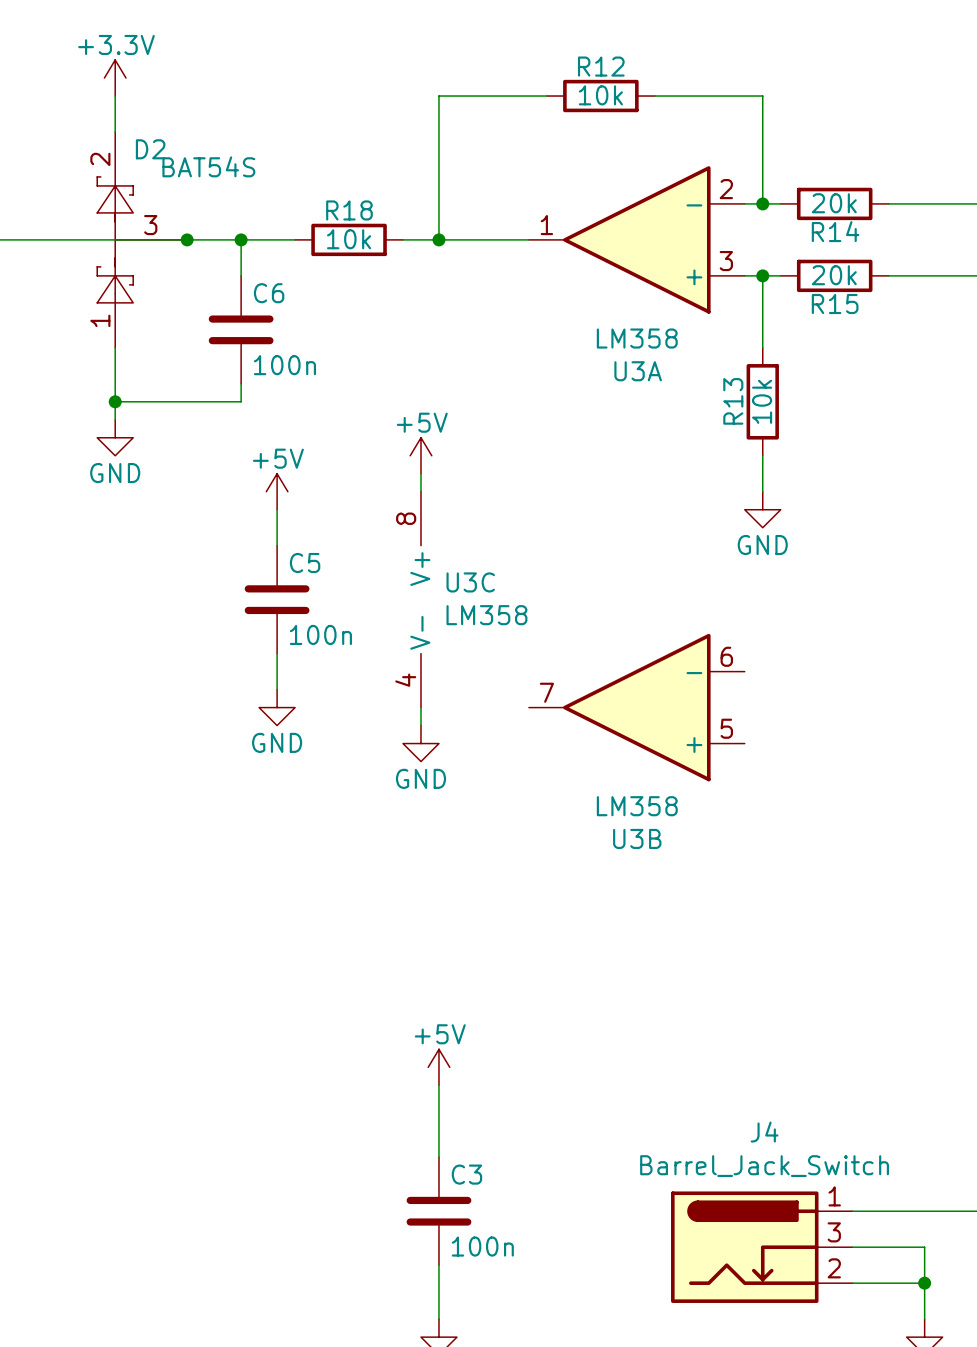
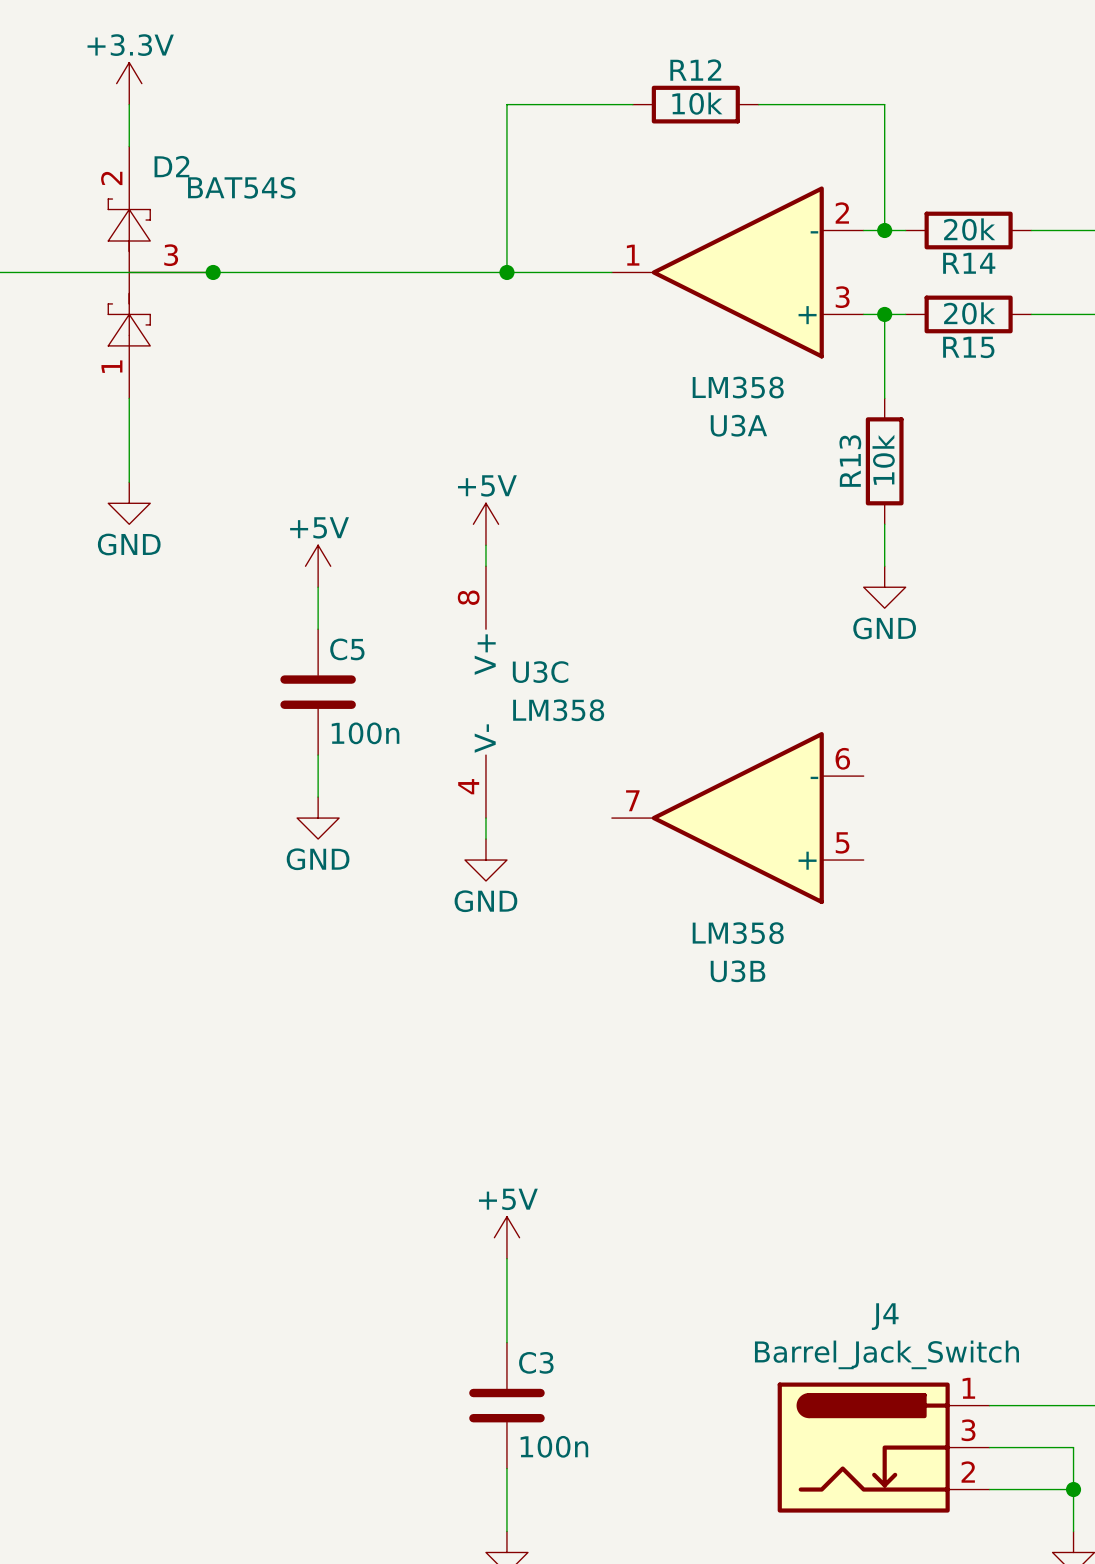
wire: (241, 239) (241, 275) -> none
junction: (241, 239) -> none
wire: none -> (339, 272) (465, 272)
R18: 10k (349, 239) -> none
C6: 100n (241, 329) -> none
wire: (241, 383) (241, 401) (115, 401) -> none
junction: (115, 401) -> none

